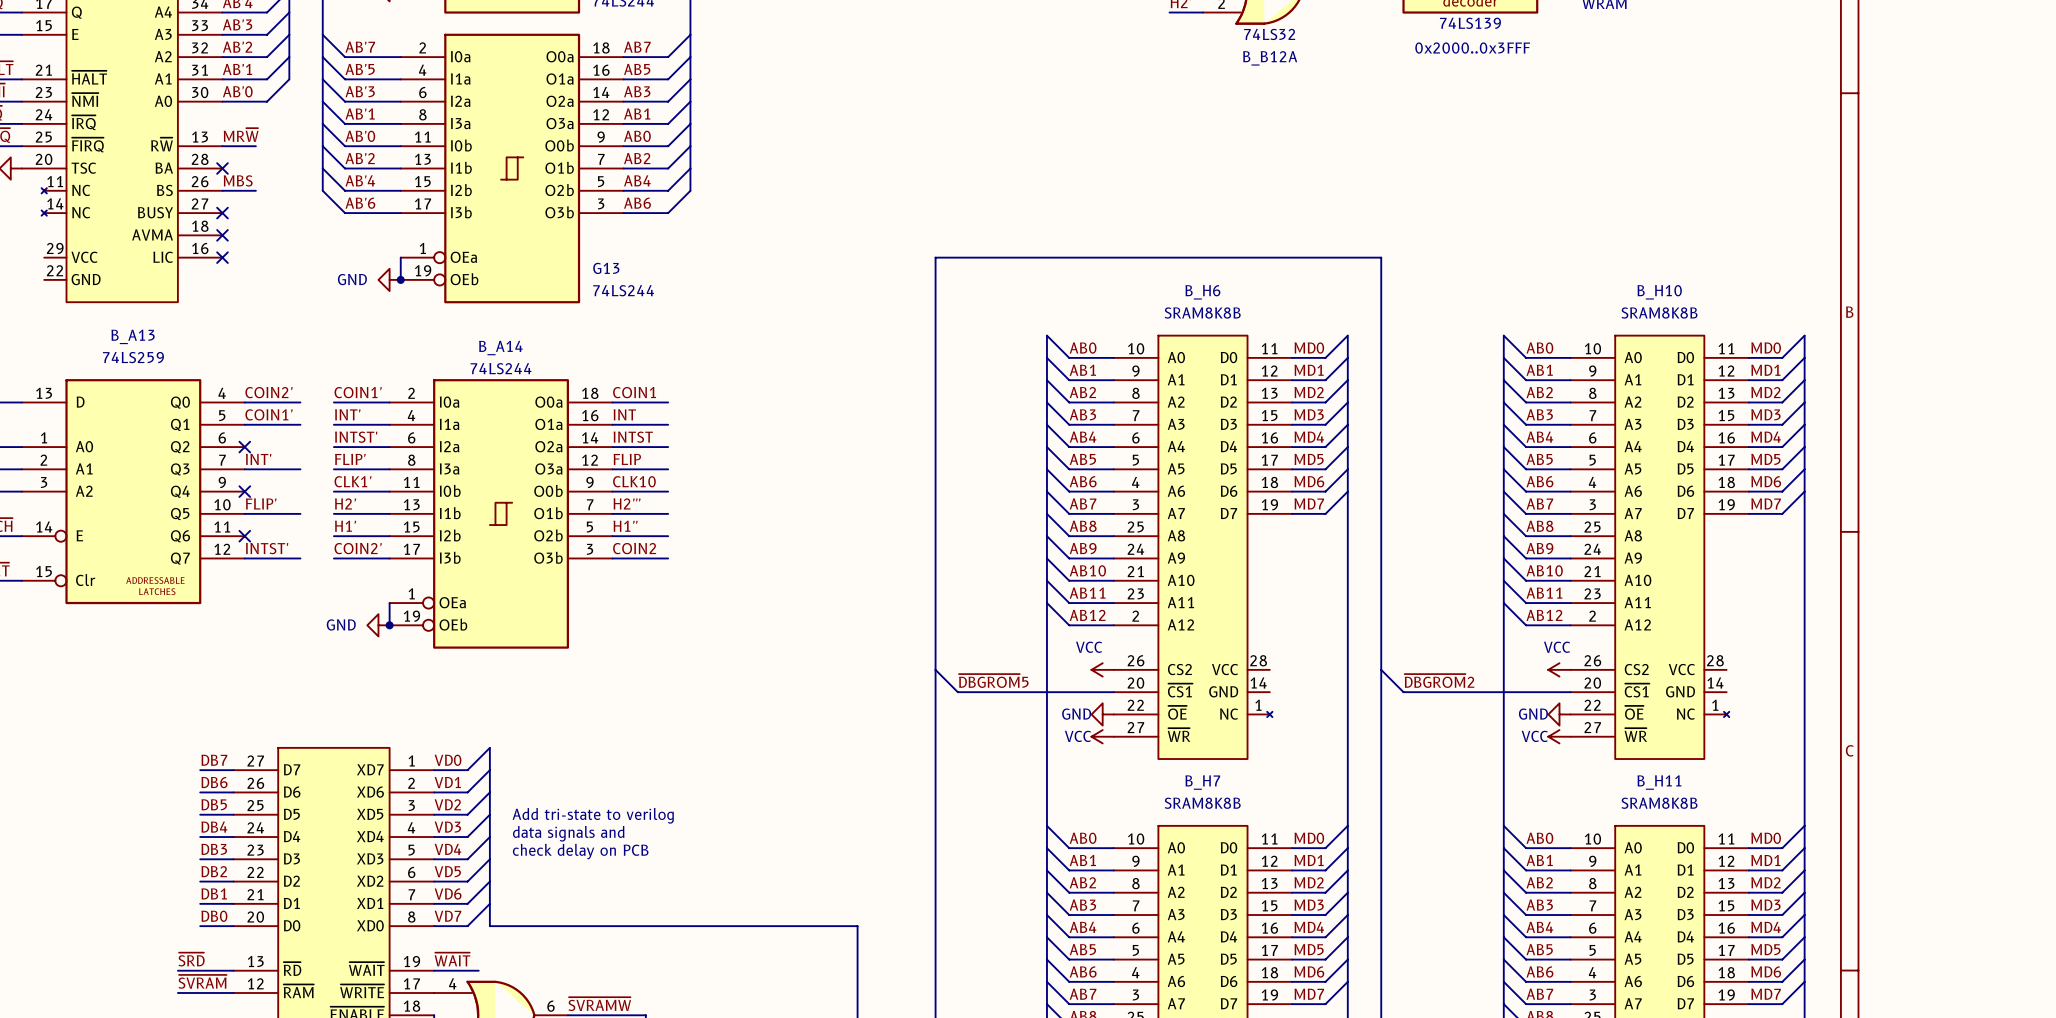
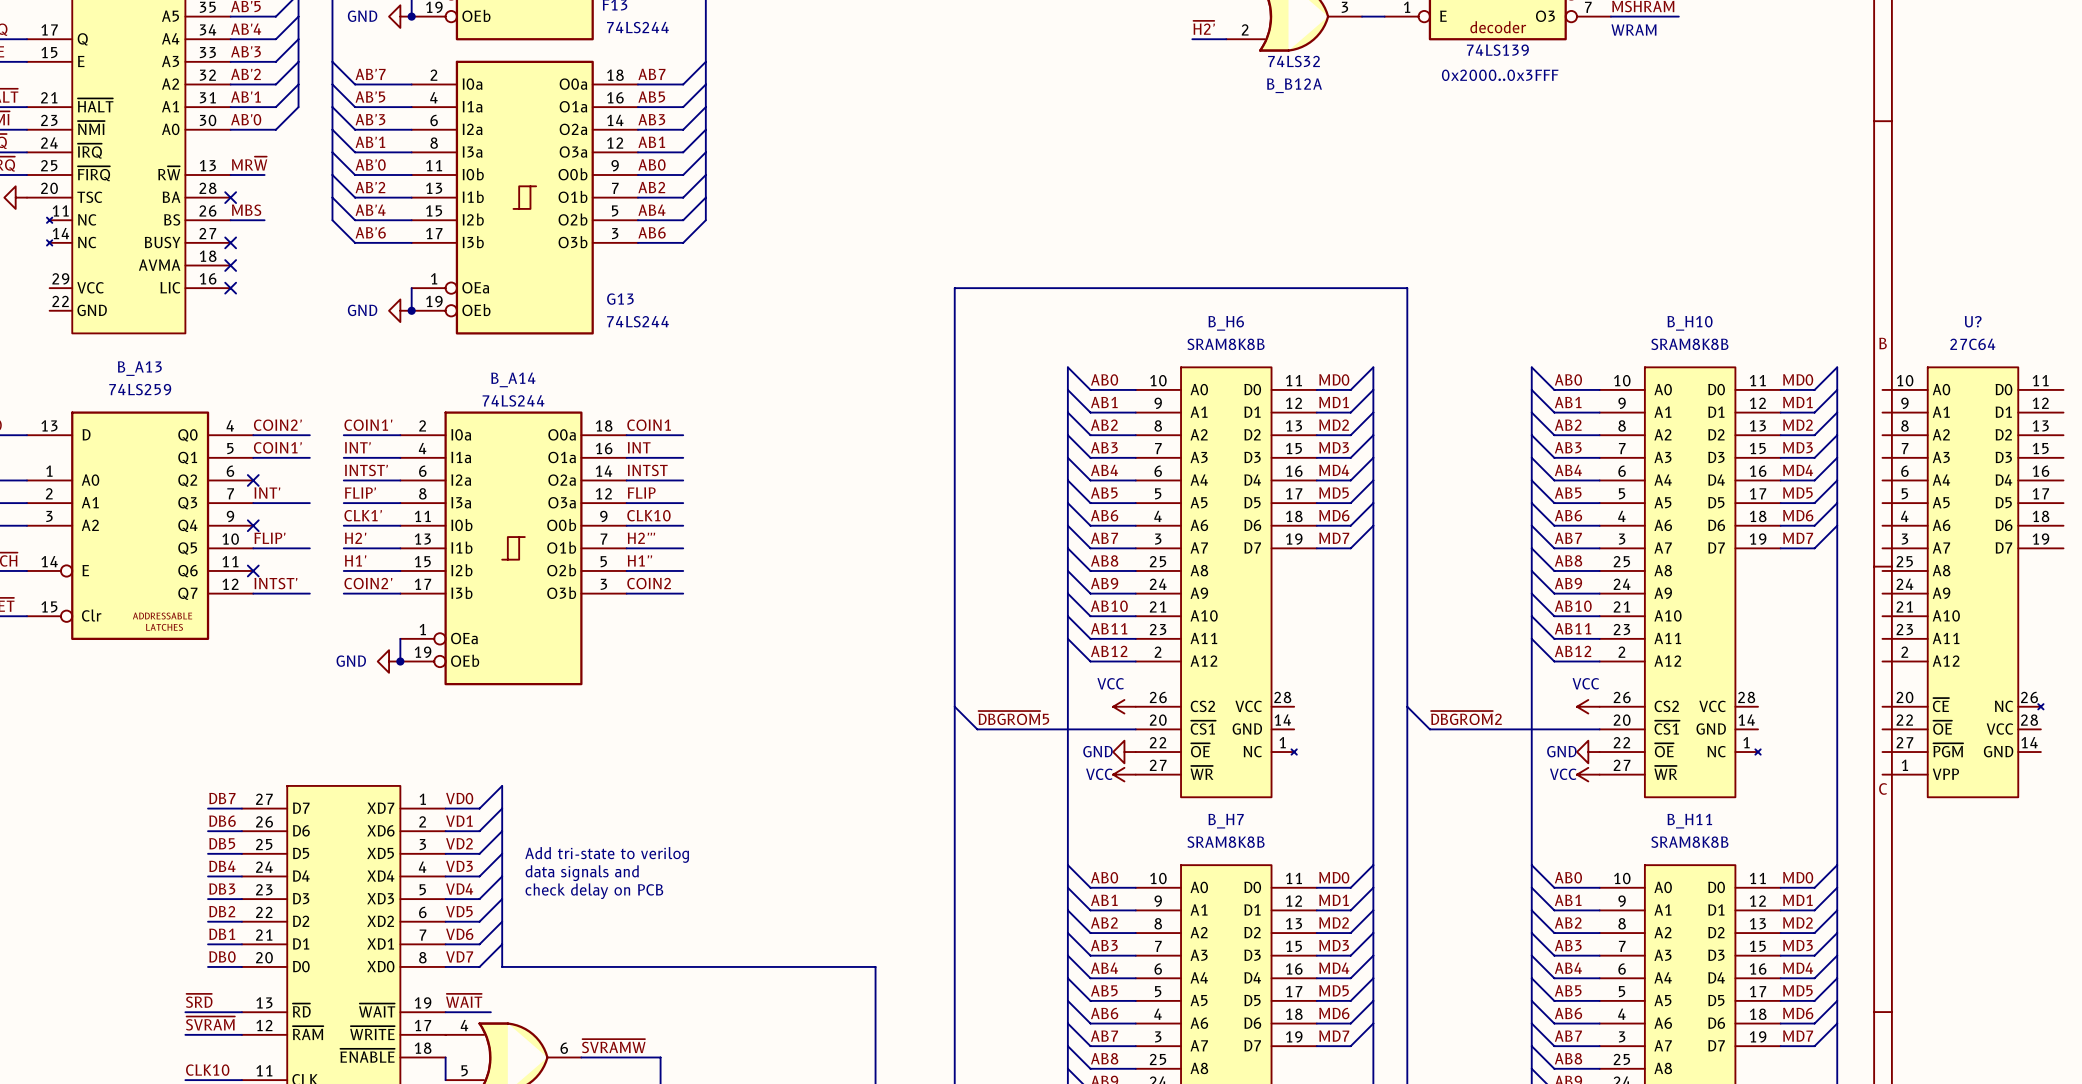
U?: none -> 27C64 (1973, 582)

